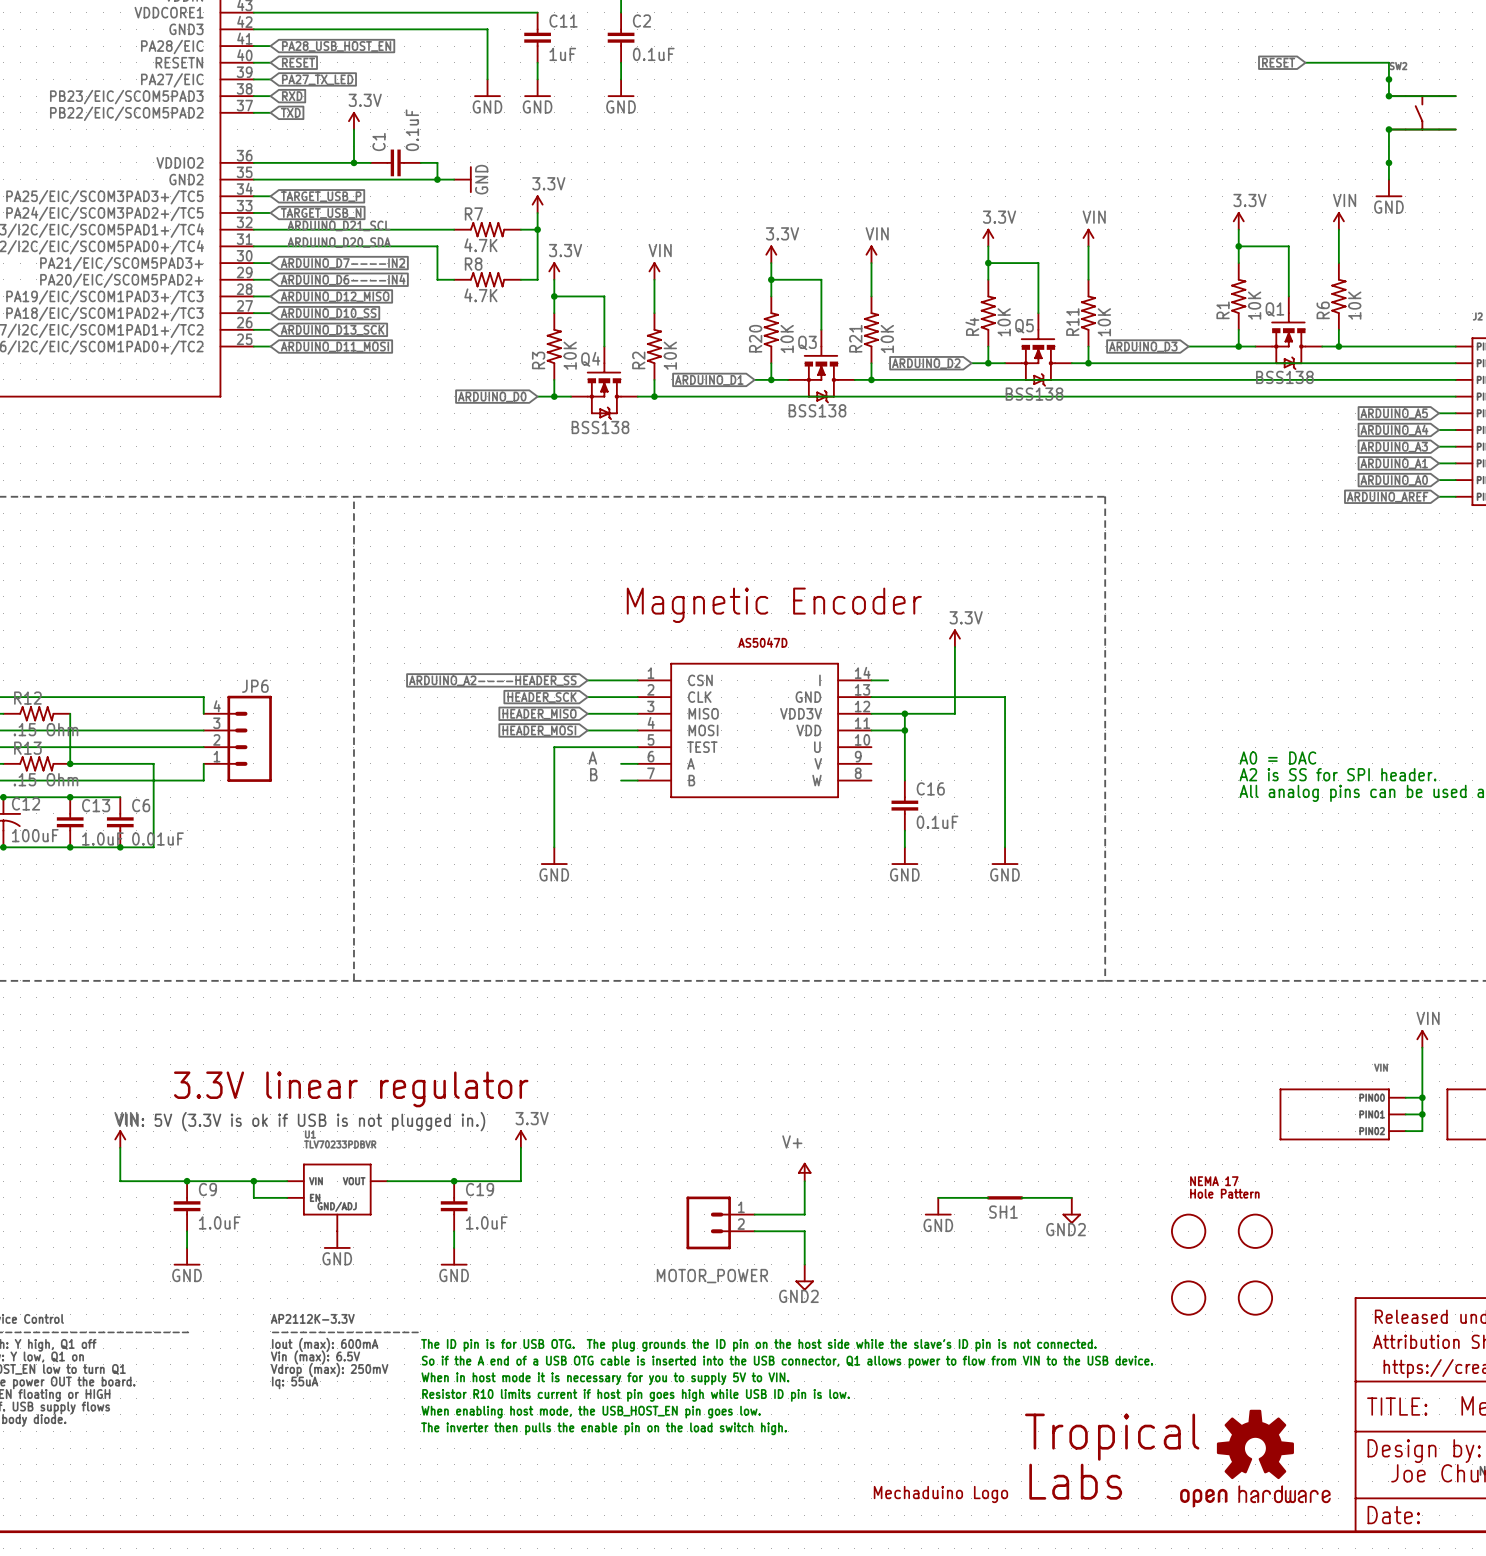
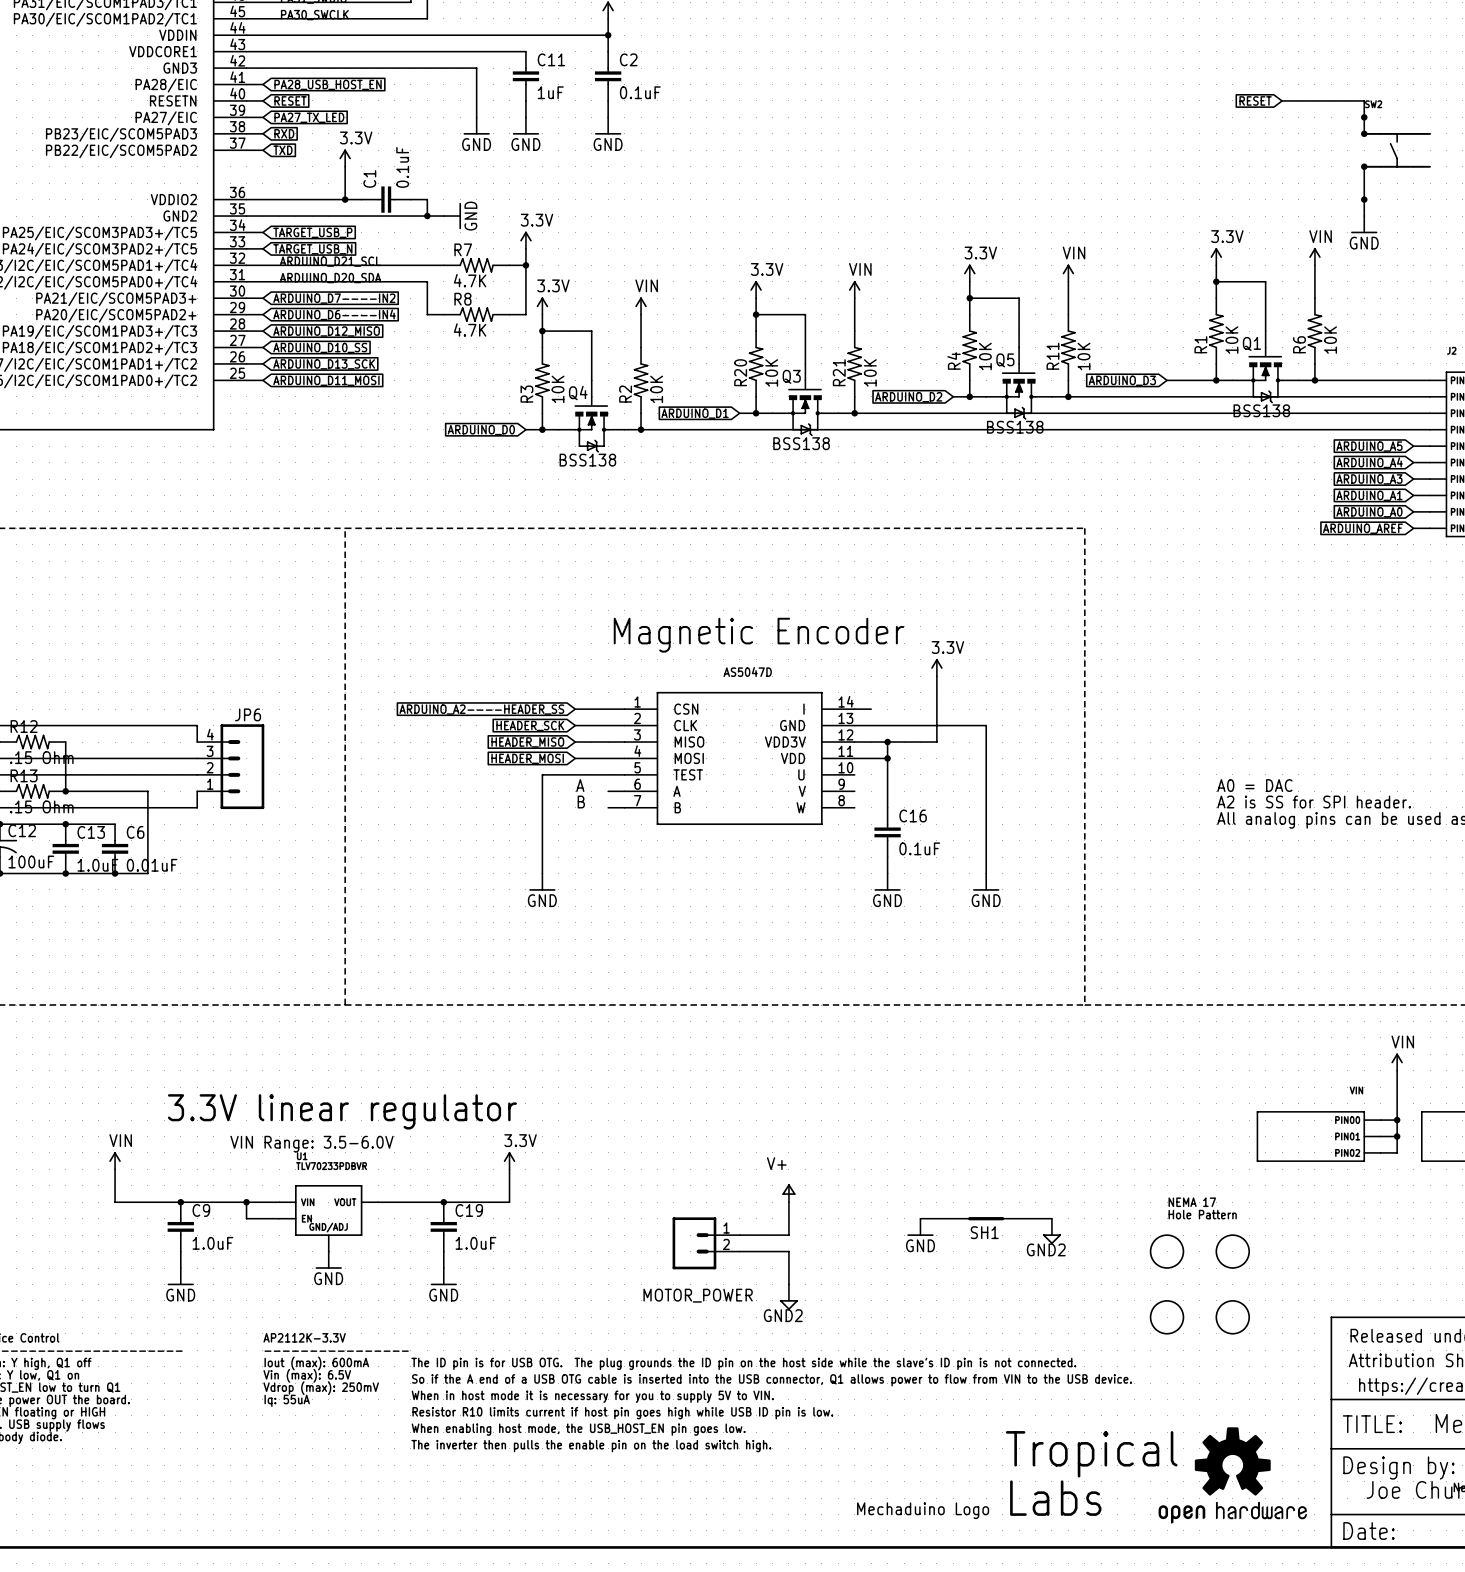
text: VIN: 5V (3.3V is ok if USB is not plugged in.) (300, 1121) -> none
text: none -> VIN Range: 3.5-6.0V (312, 1144)

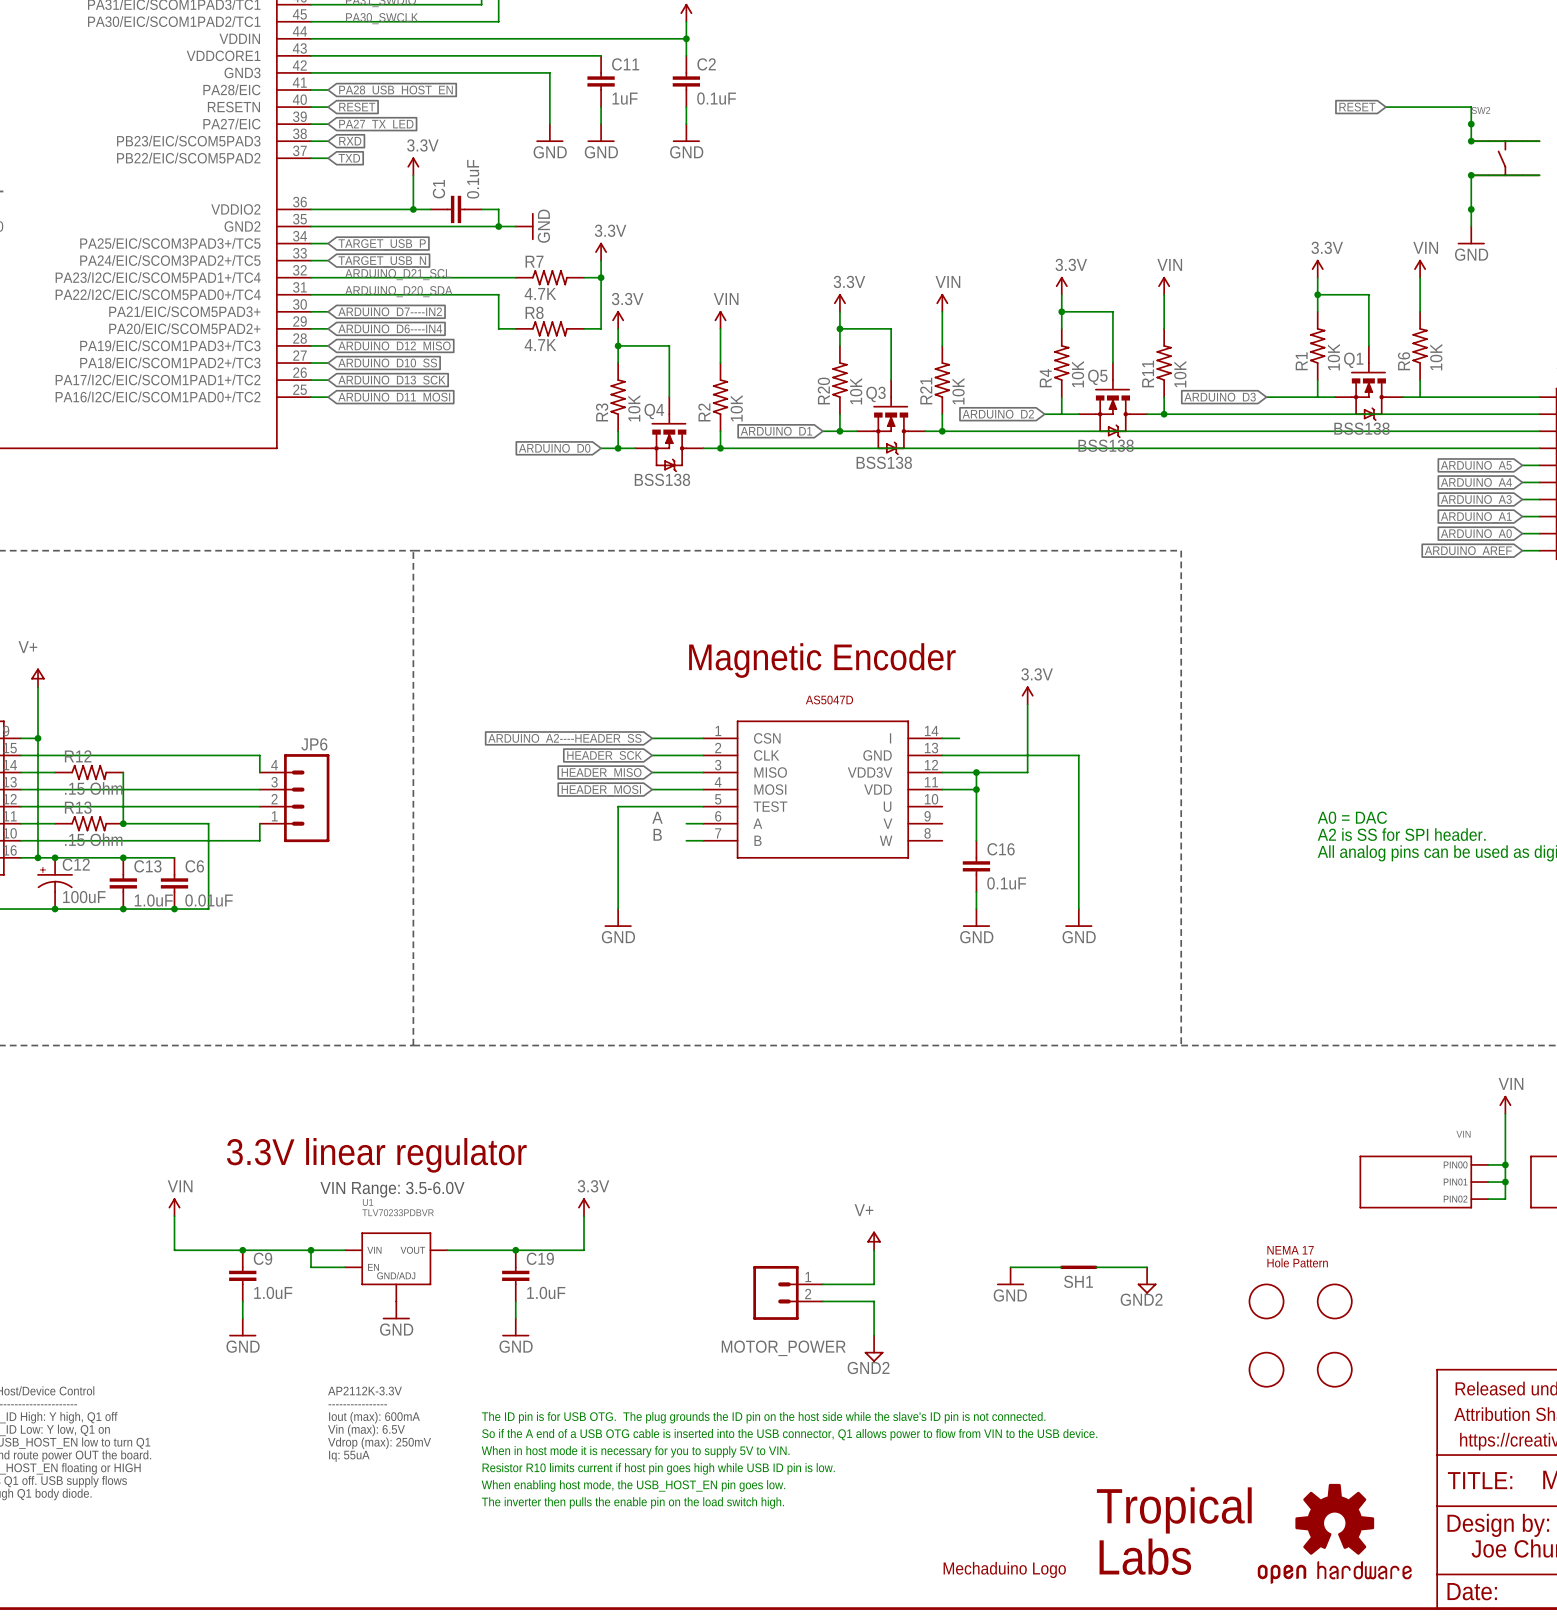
junction: (1216, 380) -> none
junction: (1314, 380) -> none
junction: (969, 396) -> none

